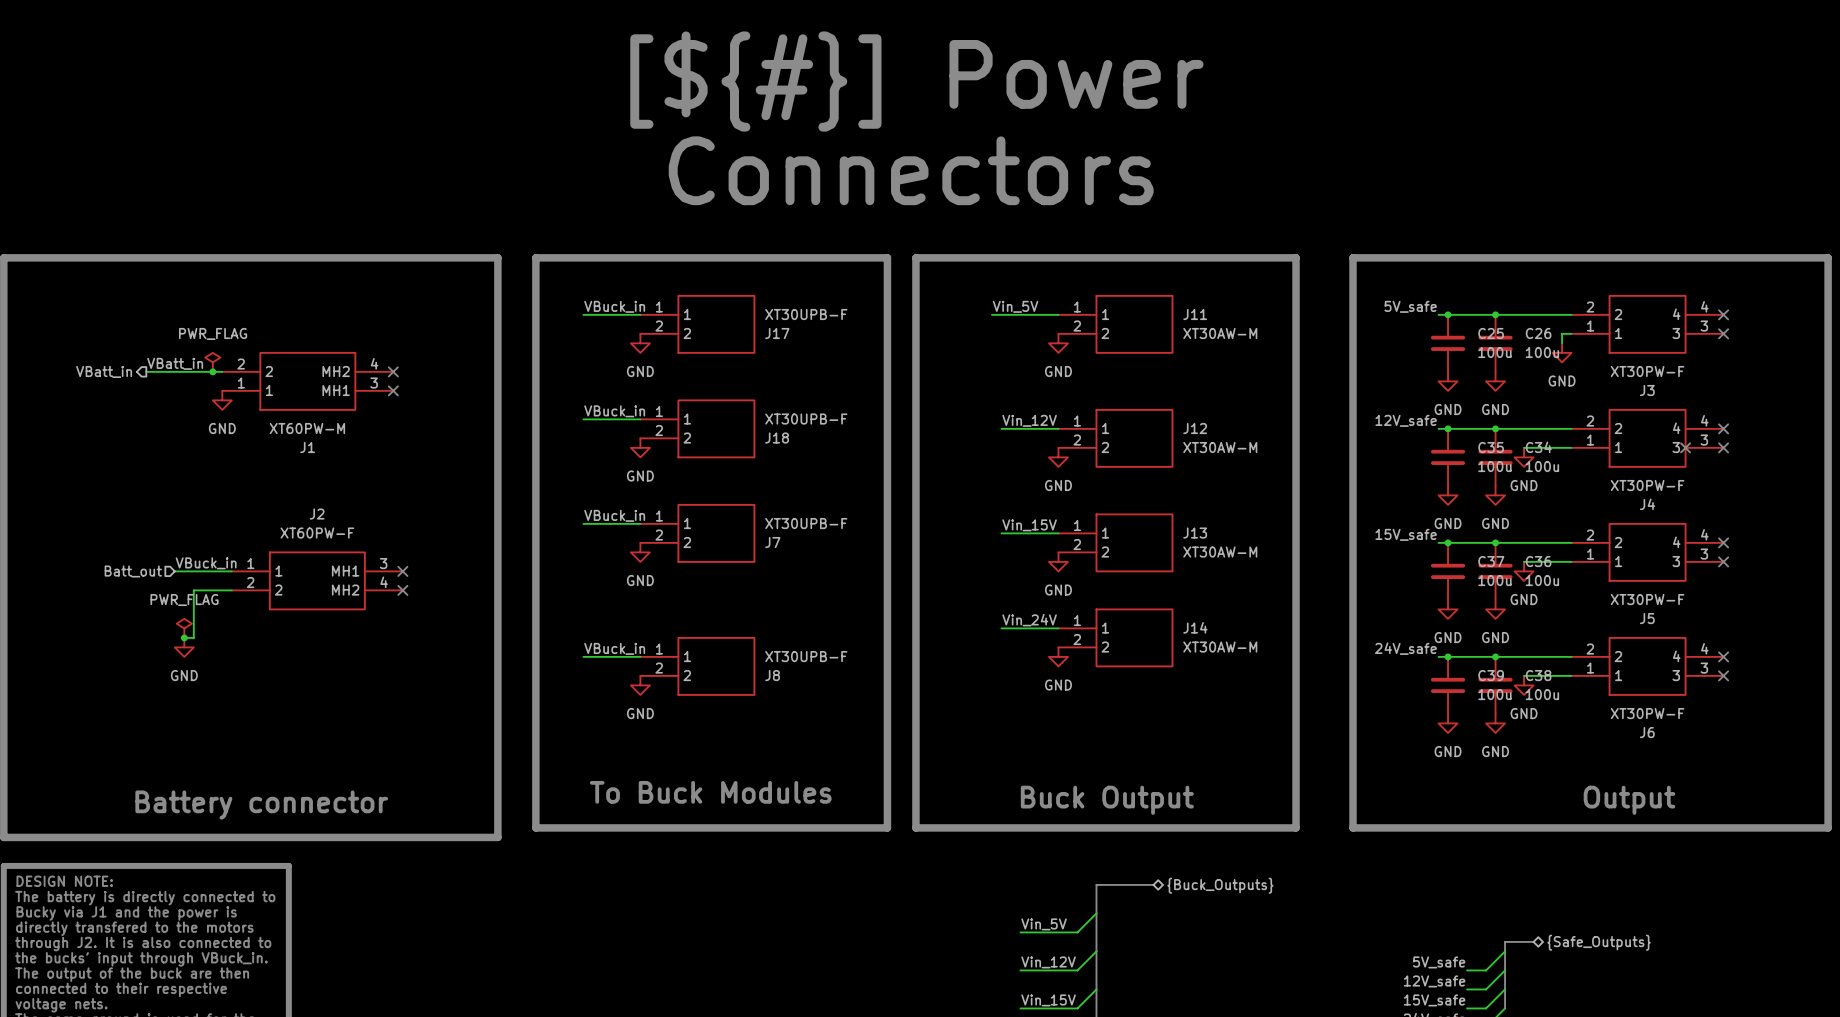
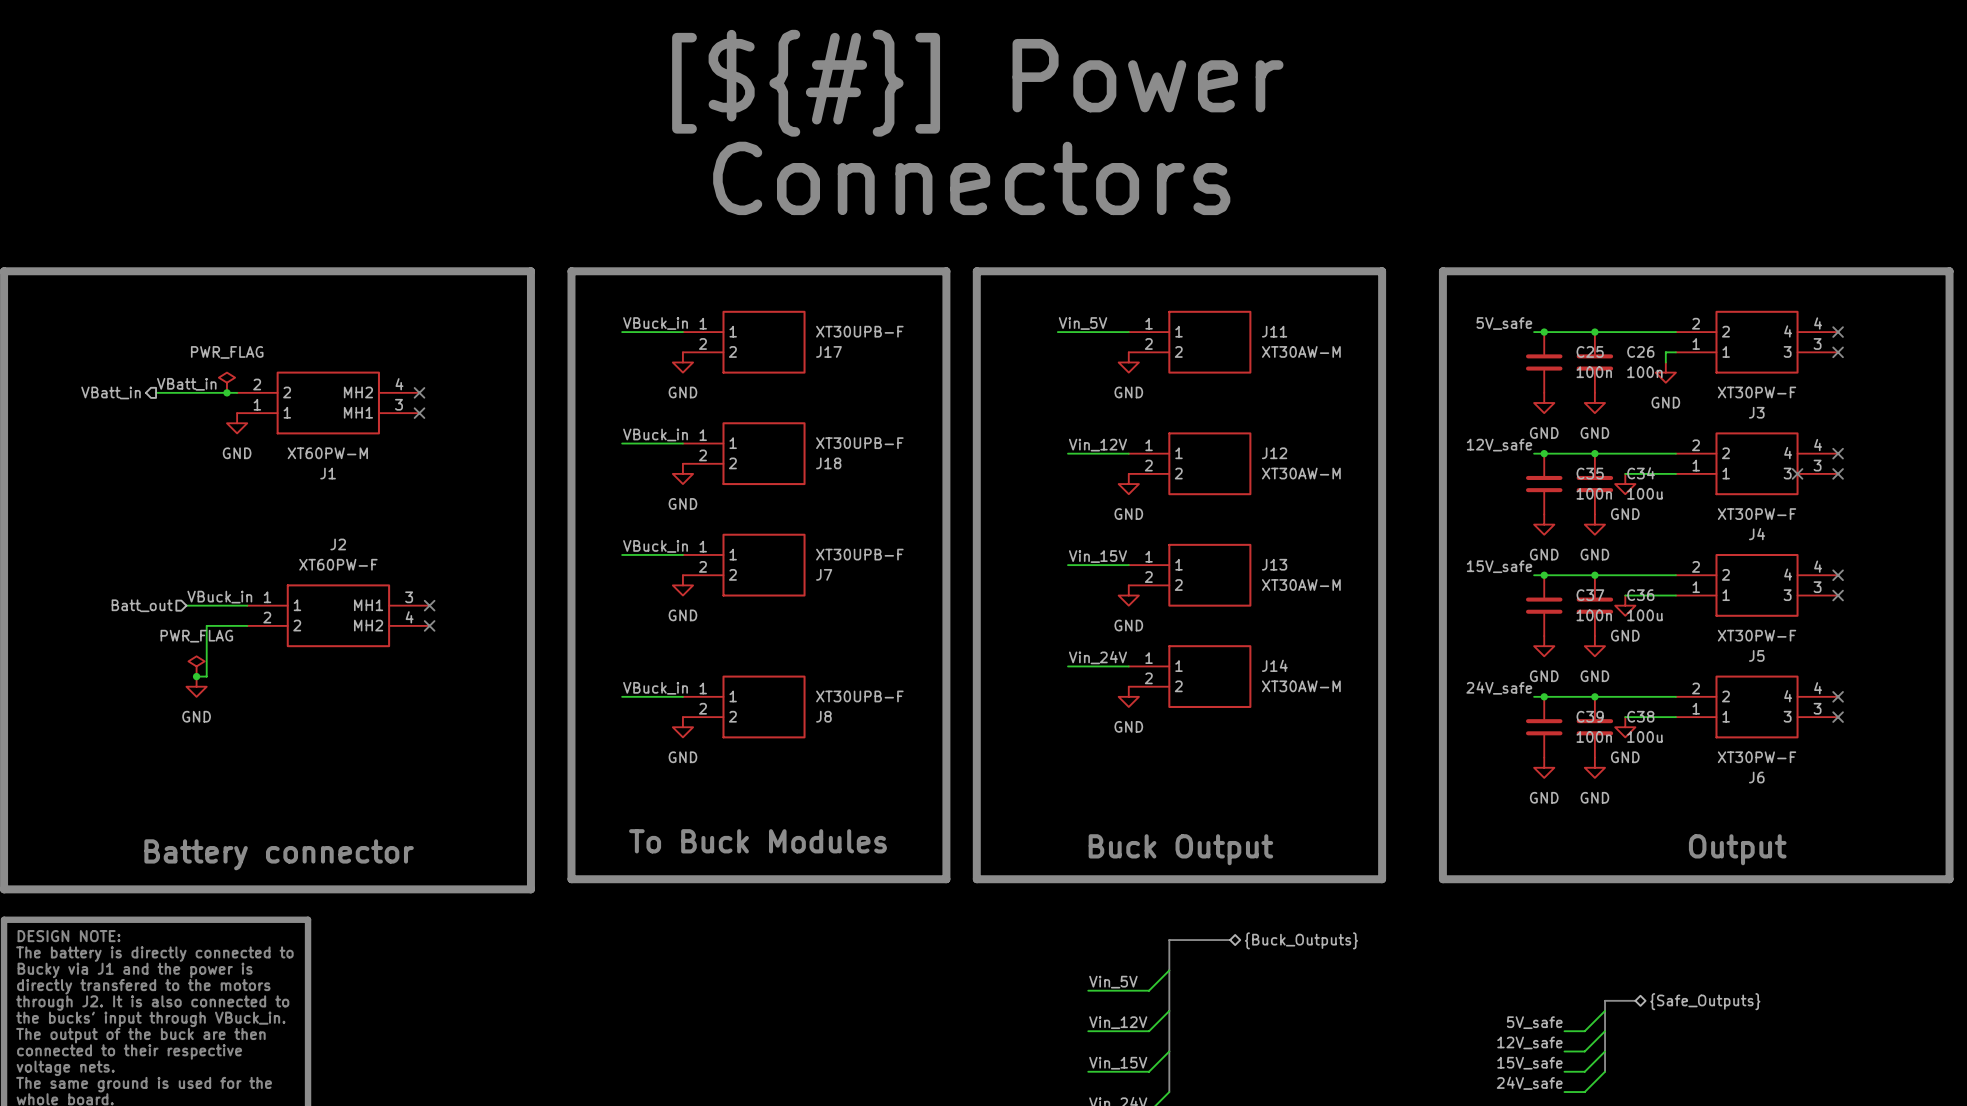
C25 value: 100u (1494, 352) -> 100n (1594, 372)
C26 value: 100u (1542, 352) -> 100n (1644, 372)
C35 value: 100u (1494, 466) -> 100n (1594, 493)
C37 value: 100u (1494, 580) -> 100n (1594, 615)
C39 value: 100u (1494, 694) -> 100n (1594, 737)

